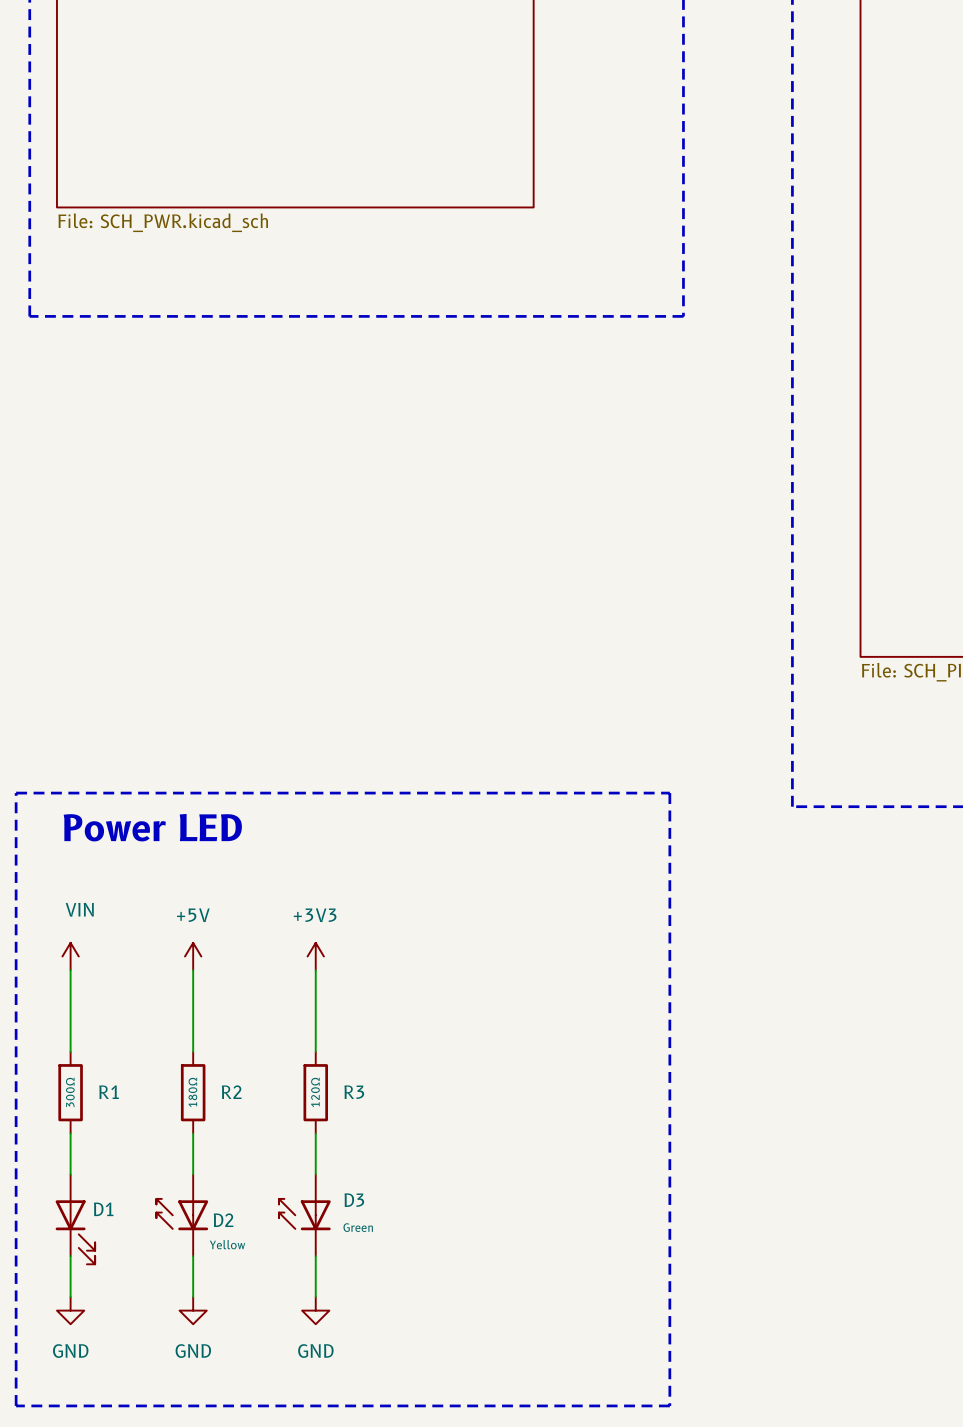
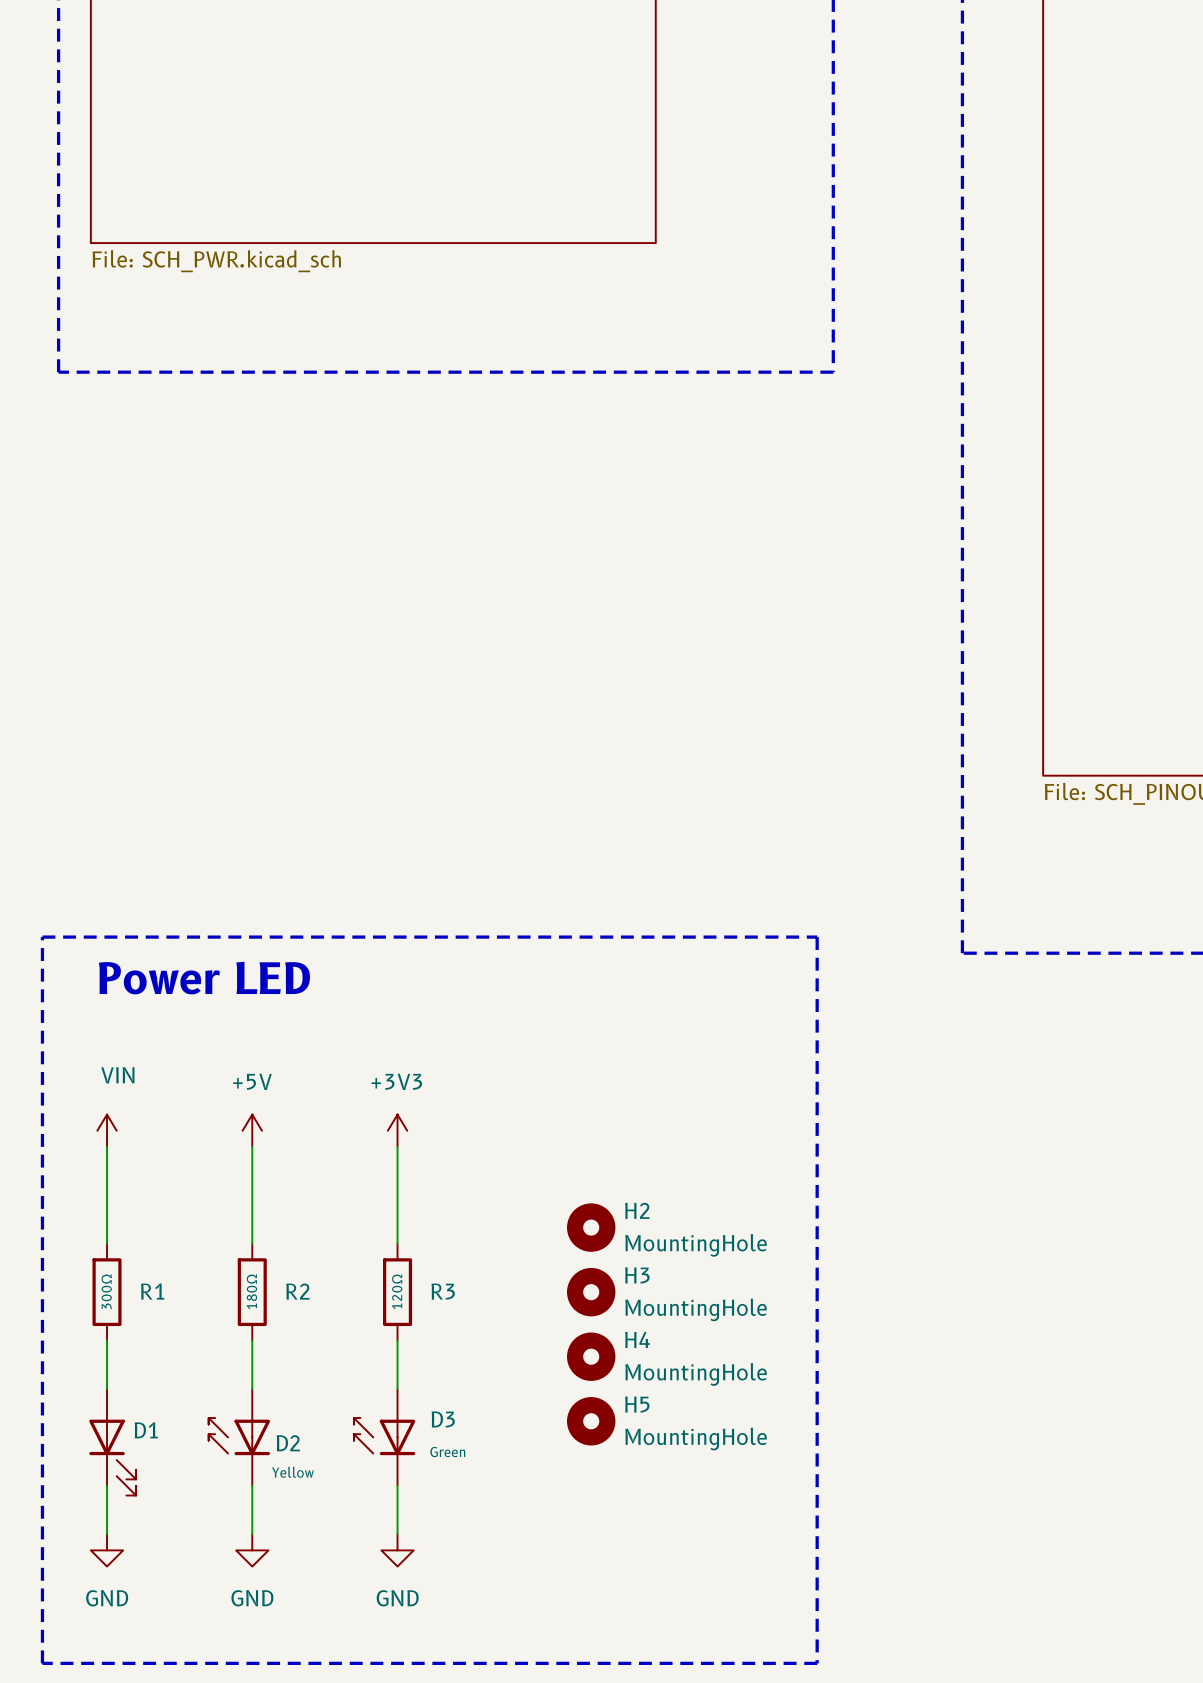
H2: none -> MountingHole (591, 1227)
H3: none -> MountingHole (591, 1292)
H4: none -> MountingHole (591, 1356)
H5: none -> MountingHole (591, 1421)

